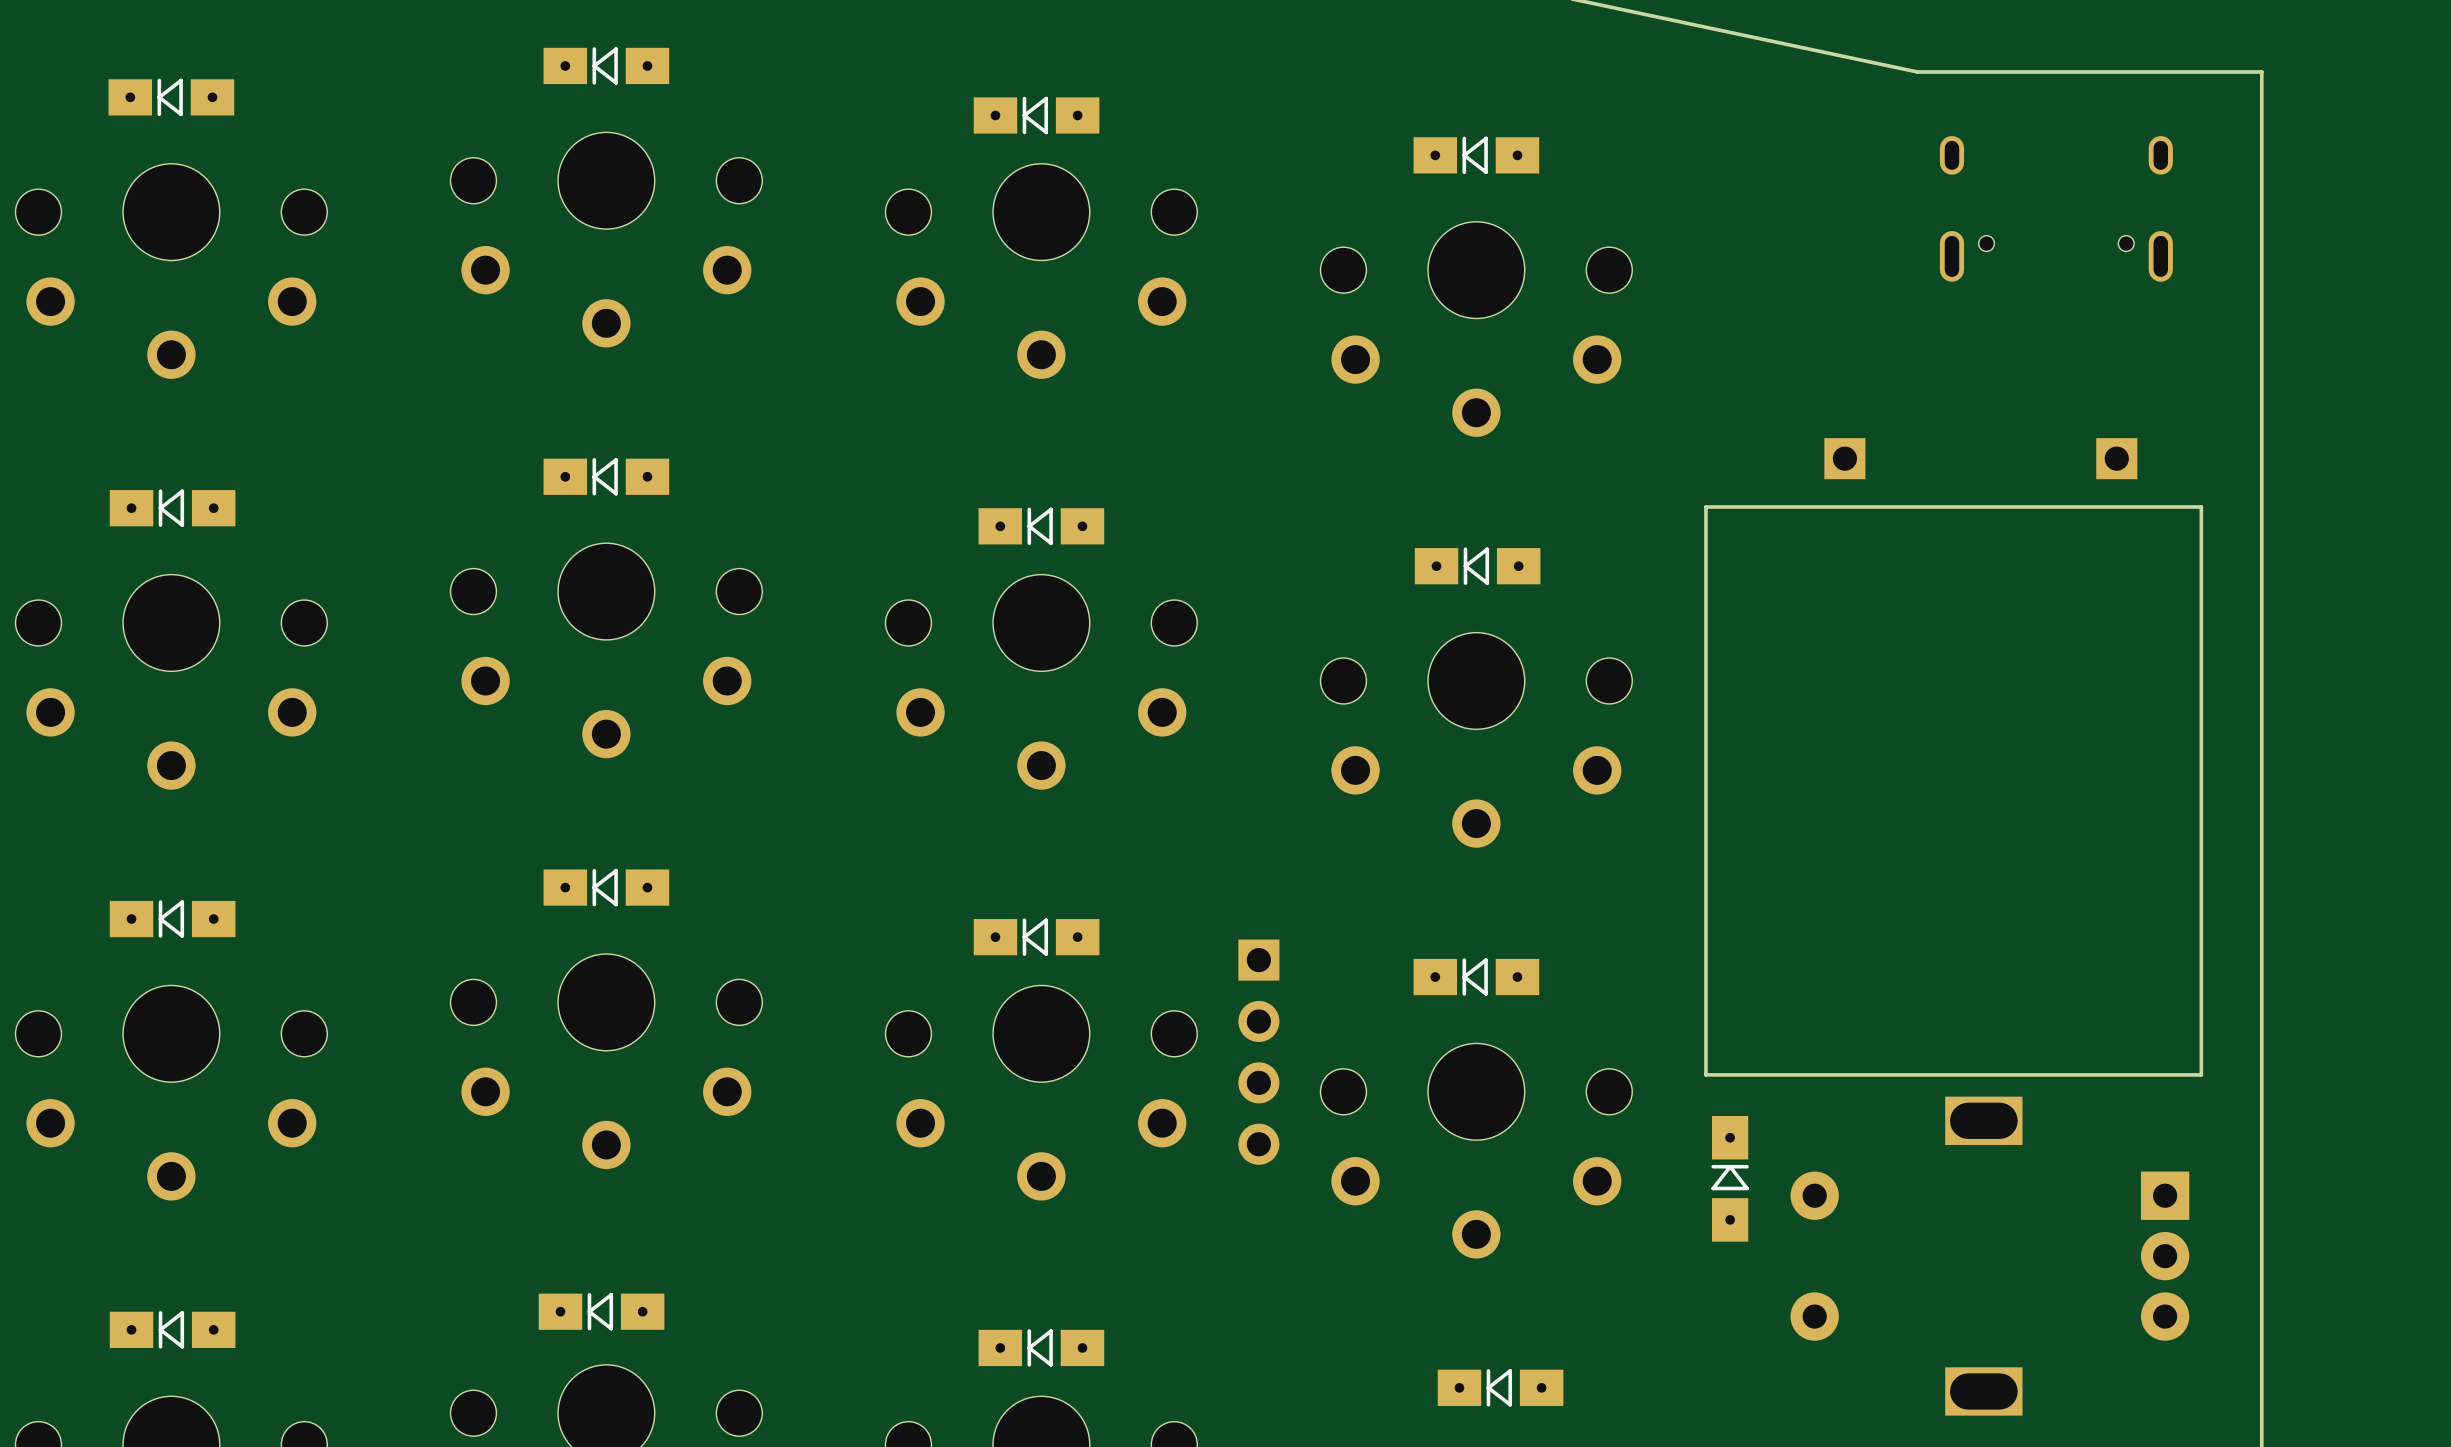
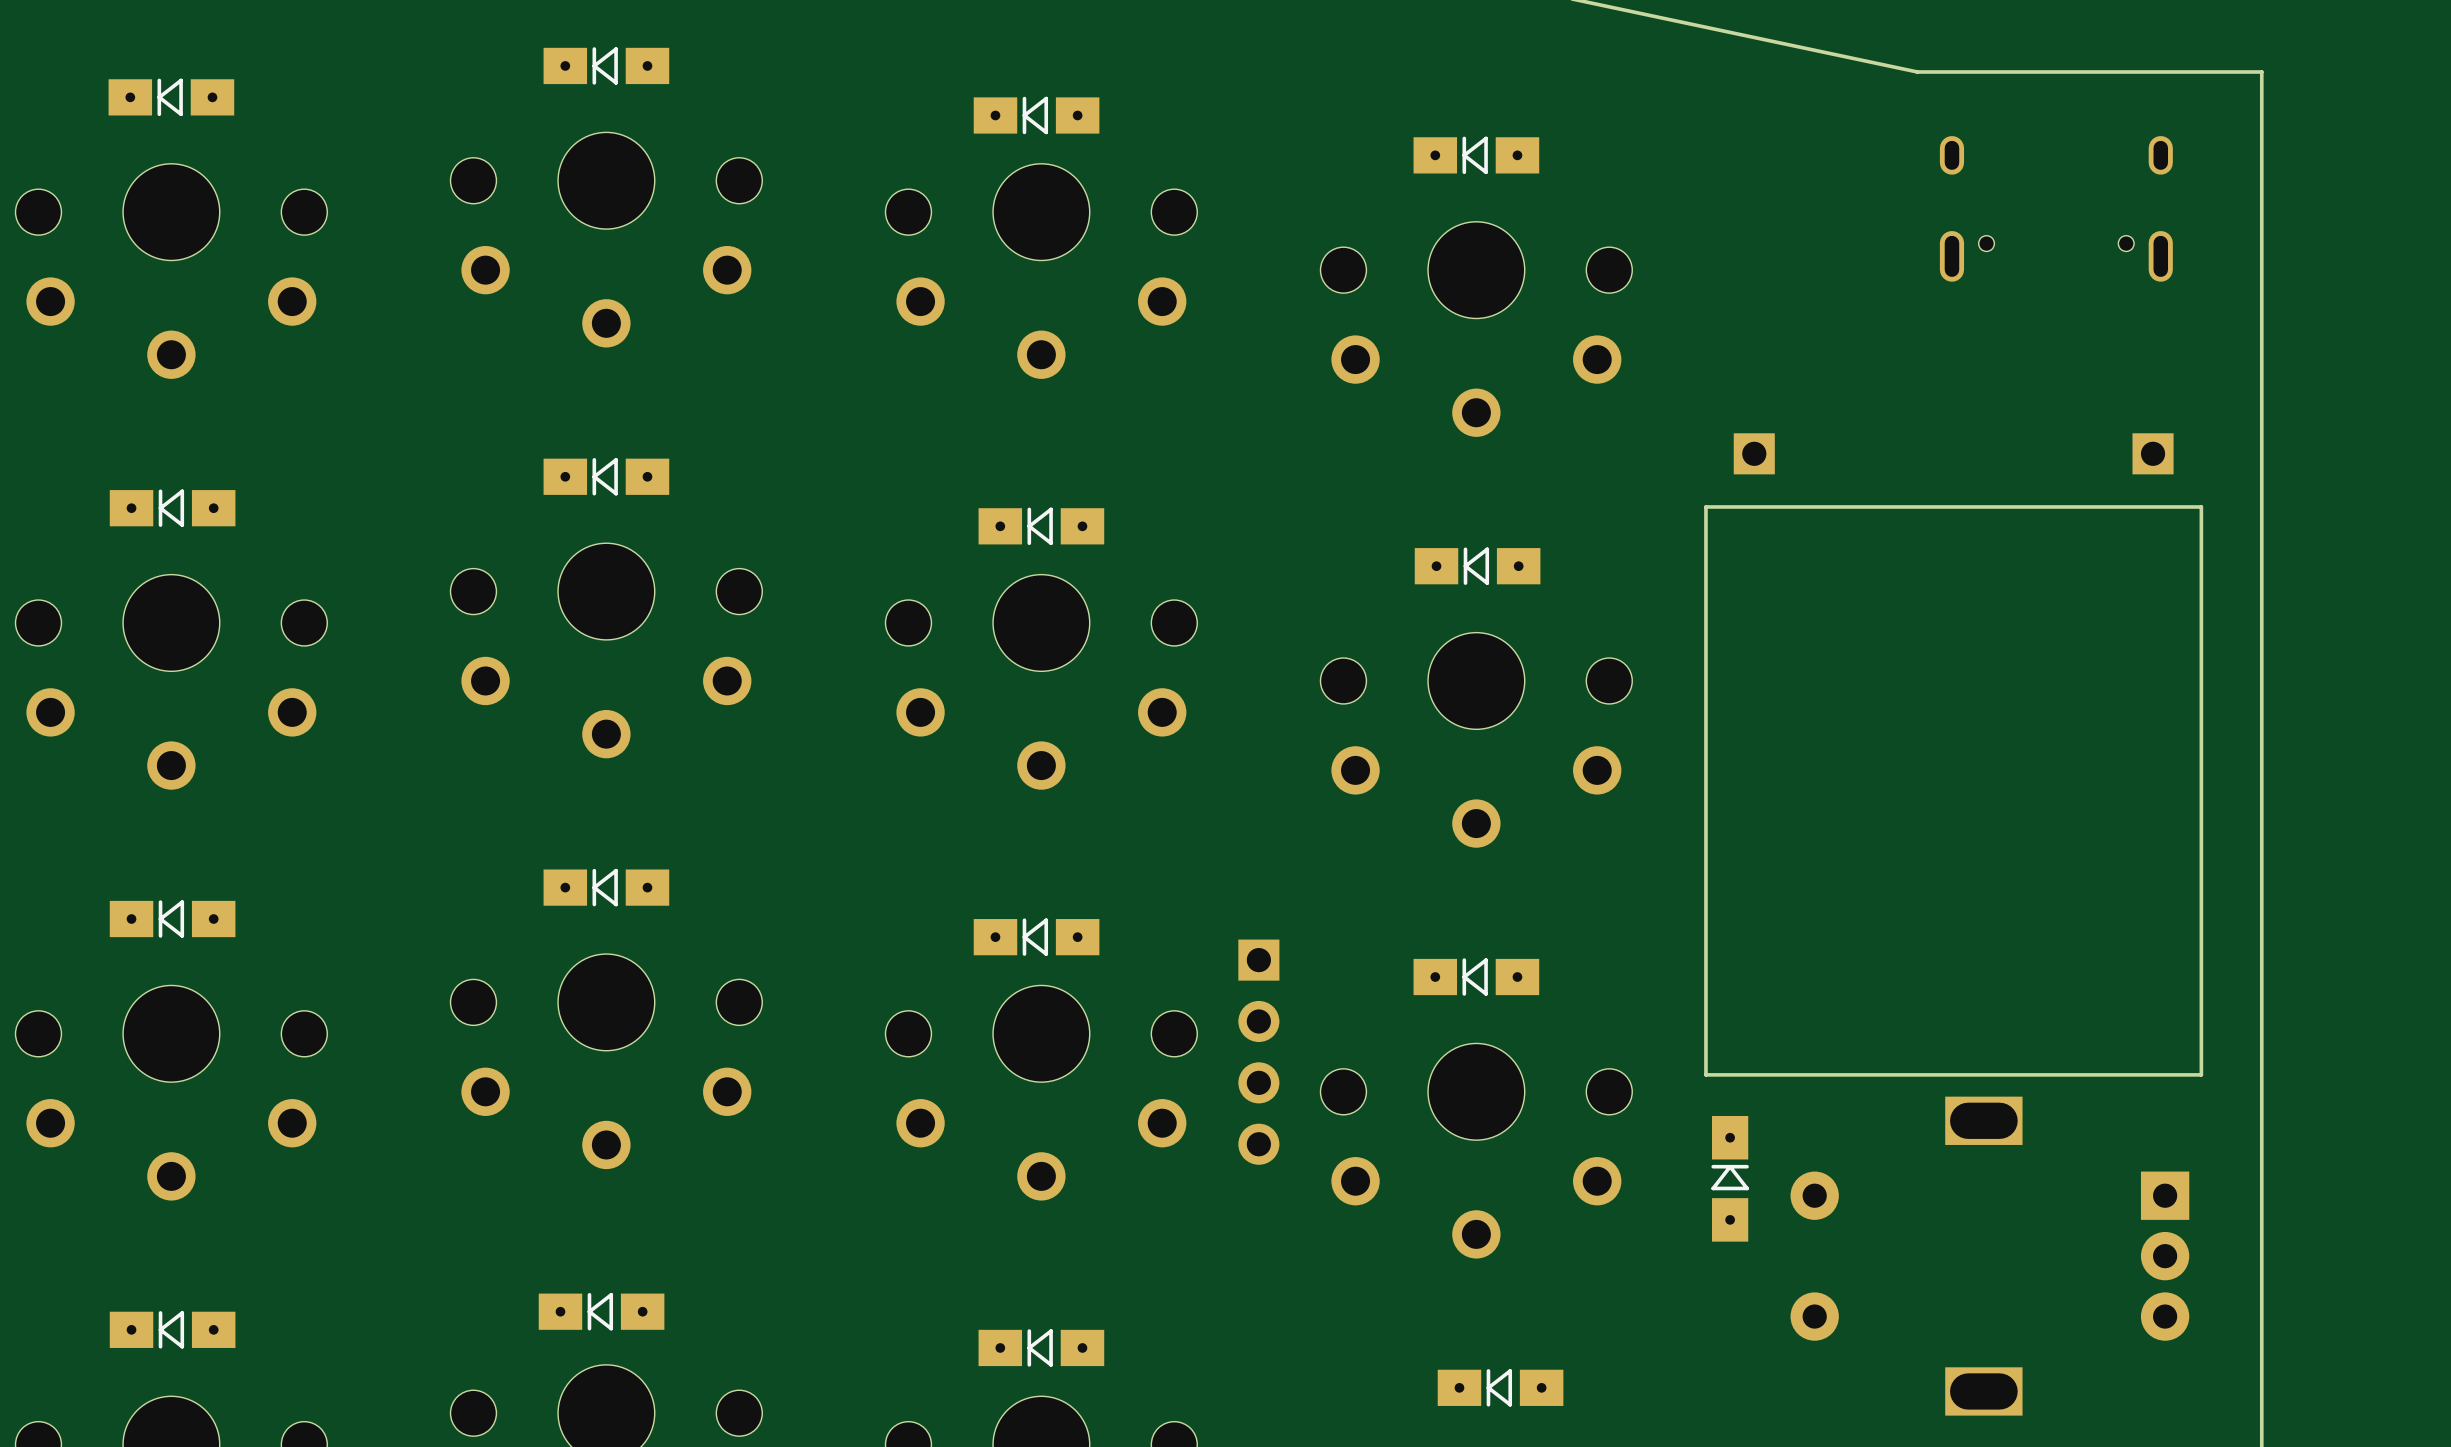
part position: (1844, 458) -> (1754, 453)
part position: (2116, 458) -> (2153, 453)

